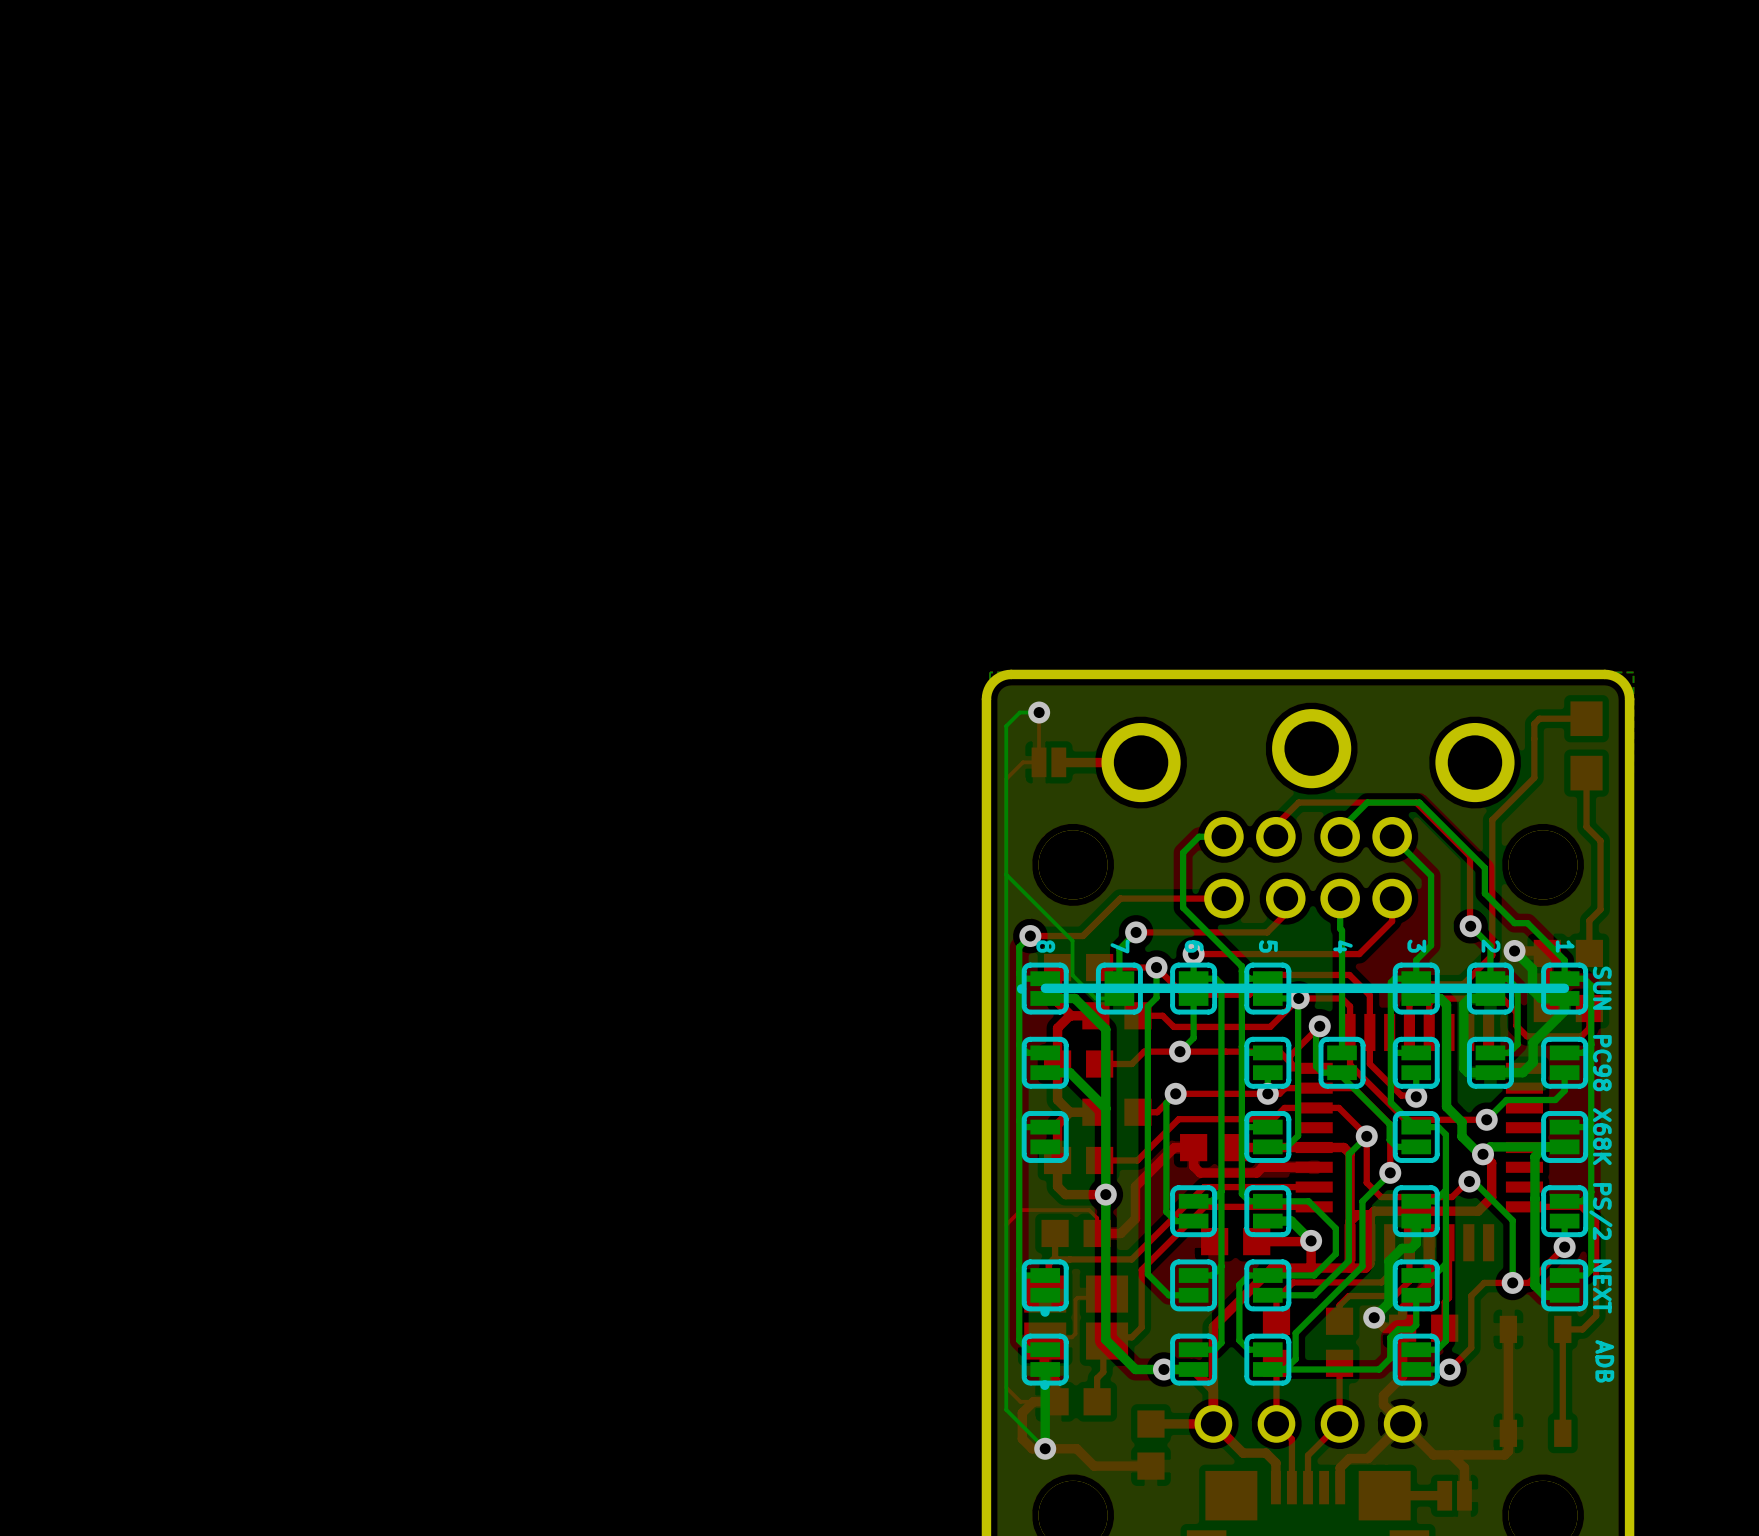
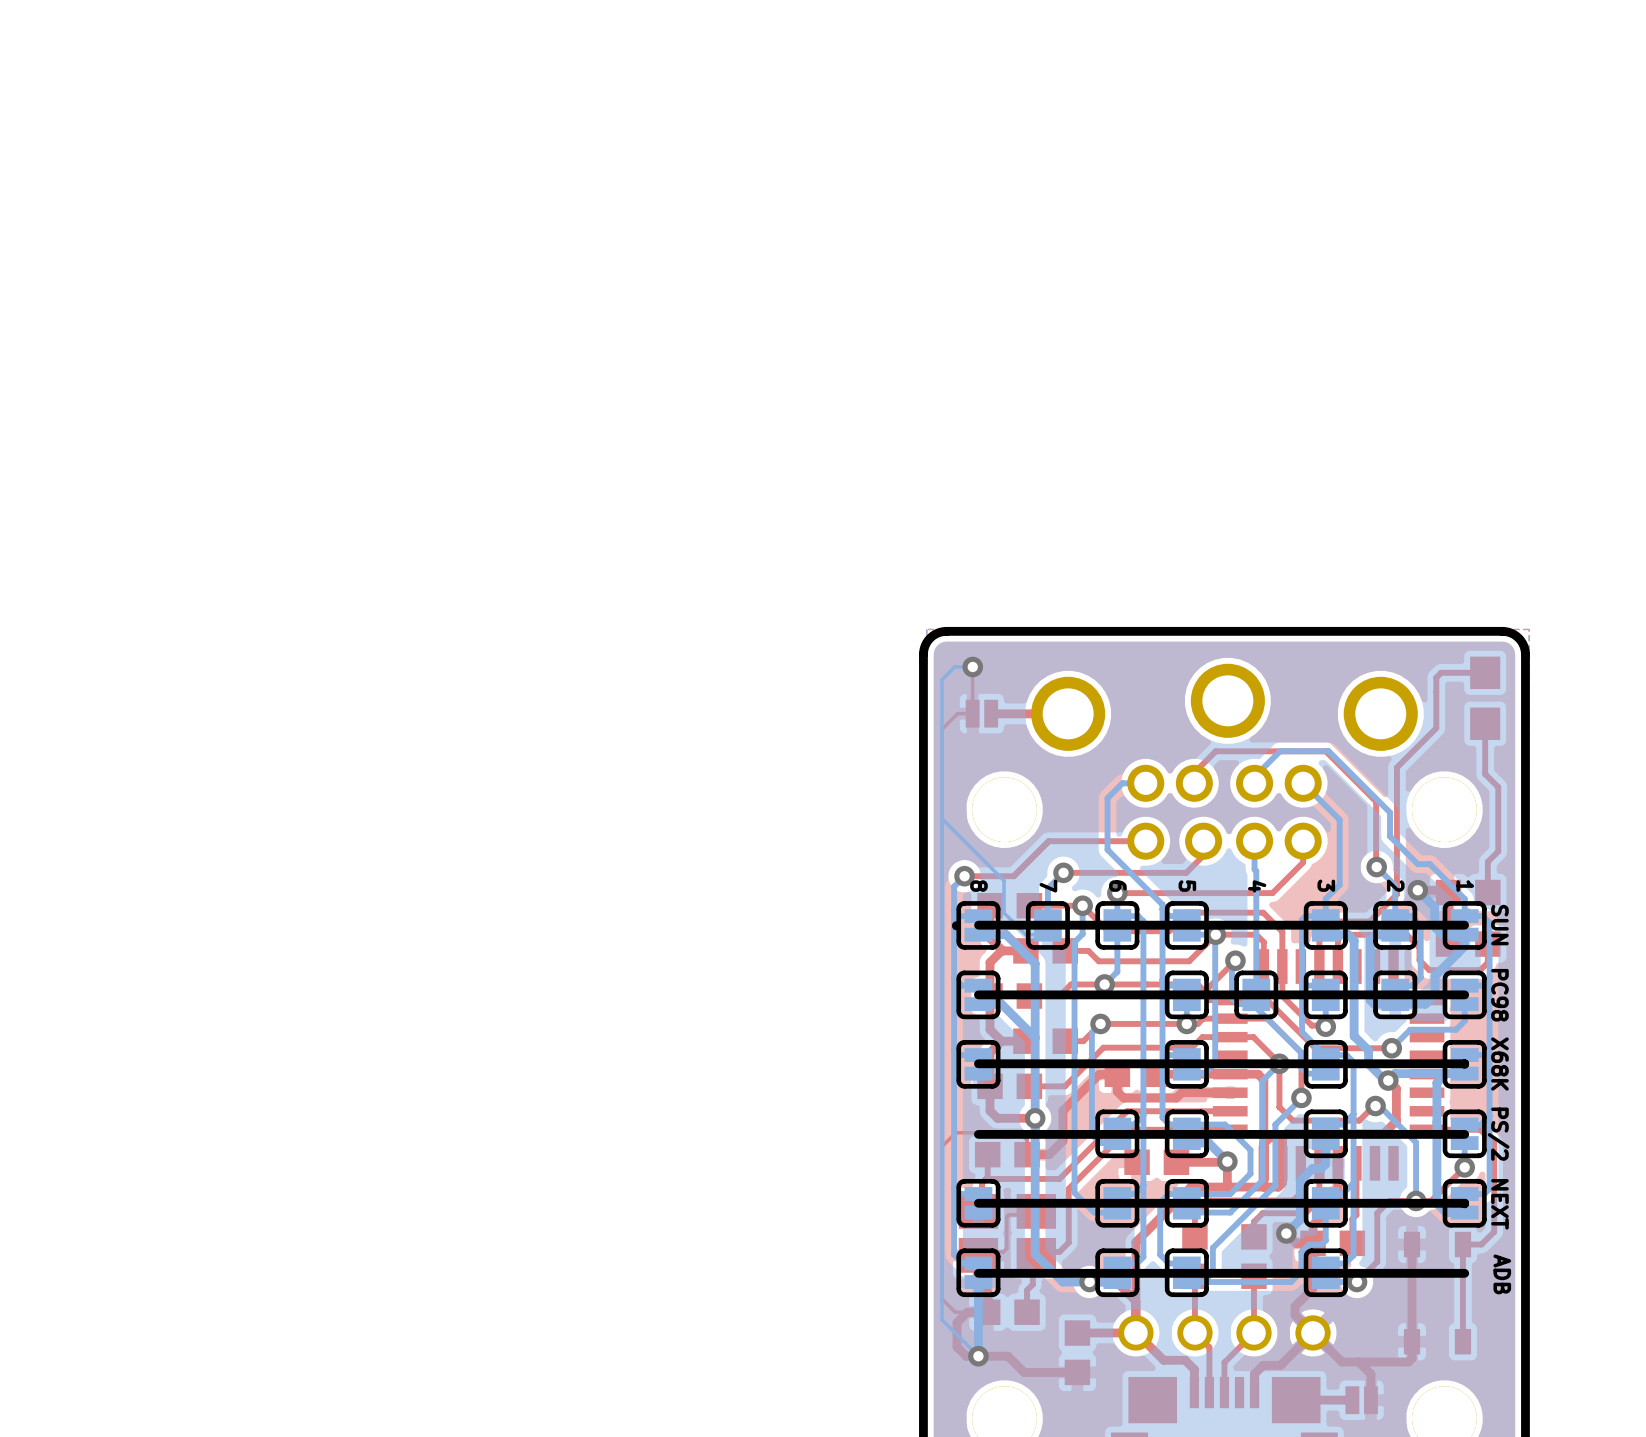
line: none -> (1464, 994) (978, 994)
line: none -> (978, 1063) (1464, 1064)
line: none -> (1464, 1134) (978, 1134)
line: none -> (978, 1203) (1464, 1203)
line: none -> (1464, 1273) (978, 1273)

